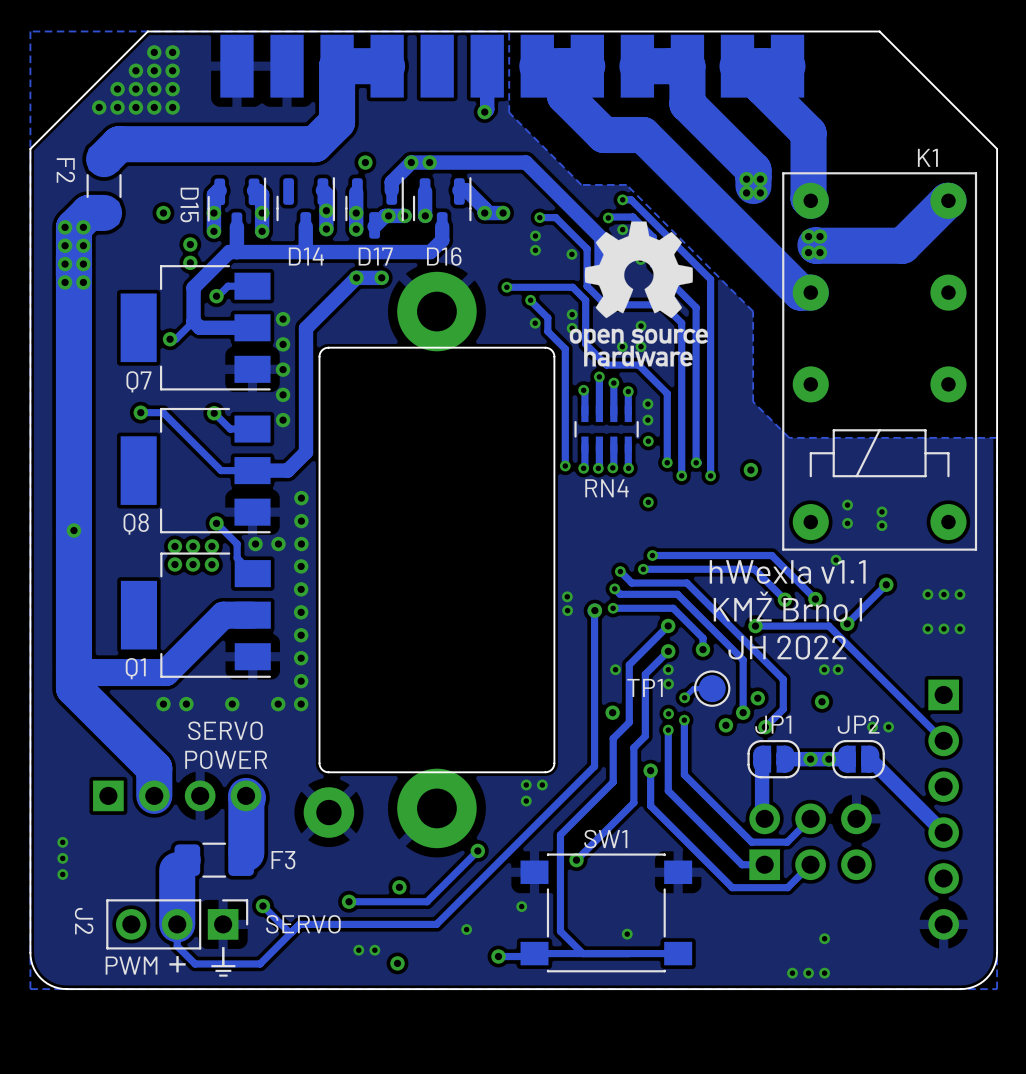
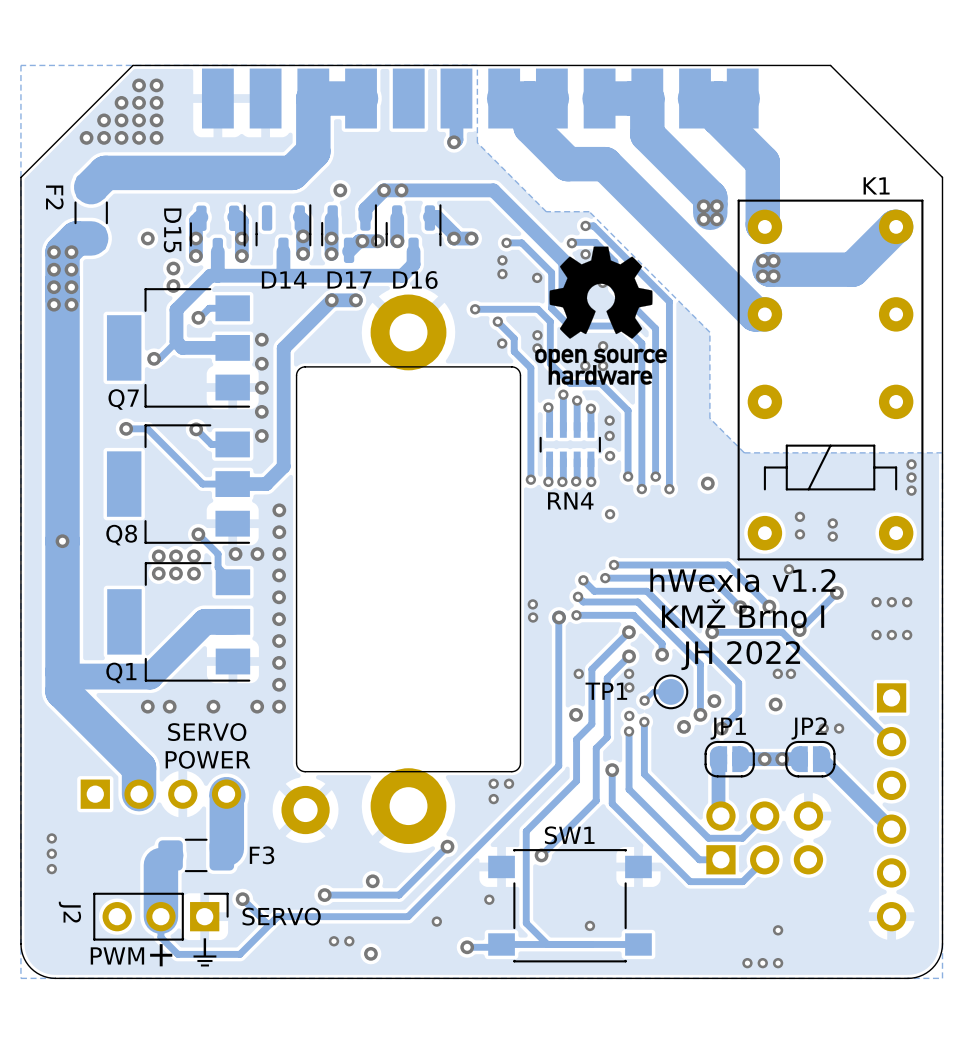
via: none -> (911, 464)
via: none -> (911, 477)
via: none -> (911, 490)
text: hWexla v1.1 (787, 572) -> hWexla v1.2 (742, 580)

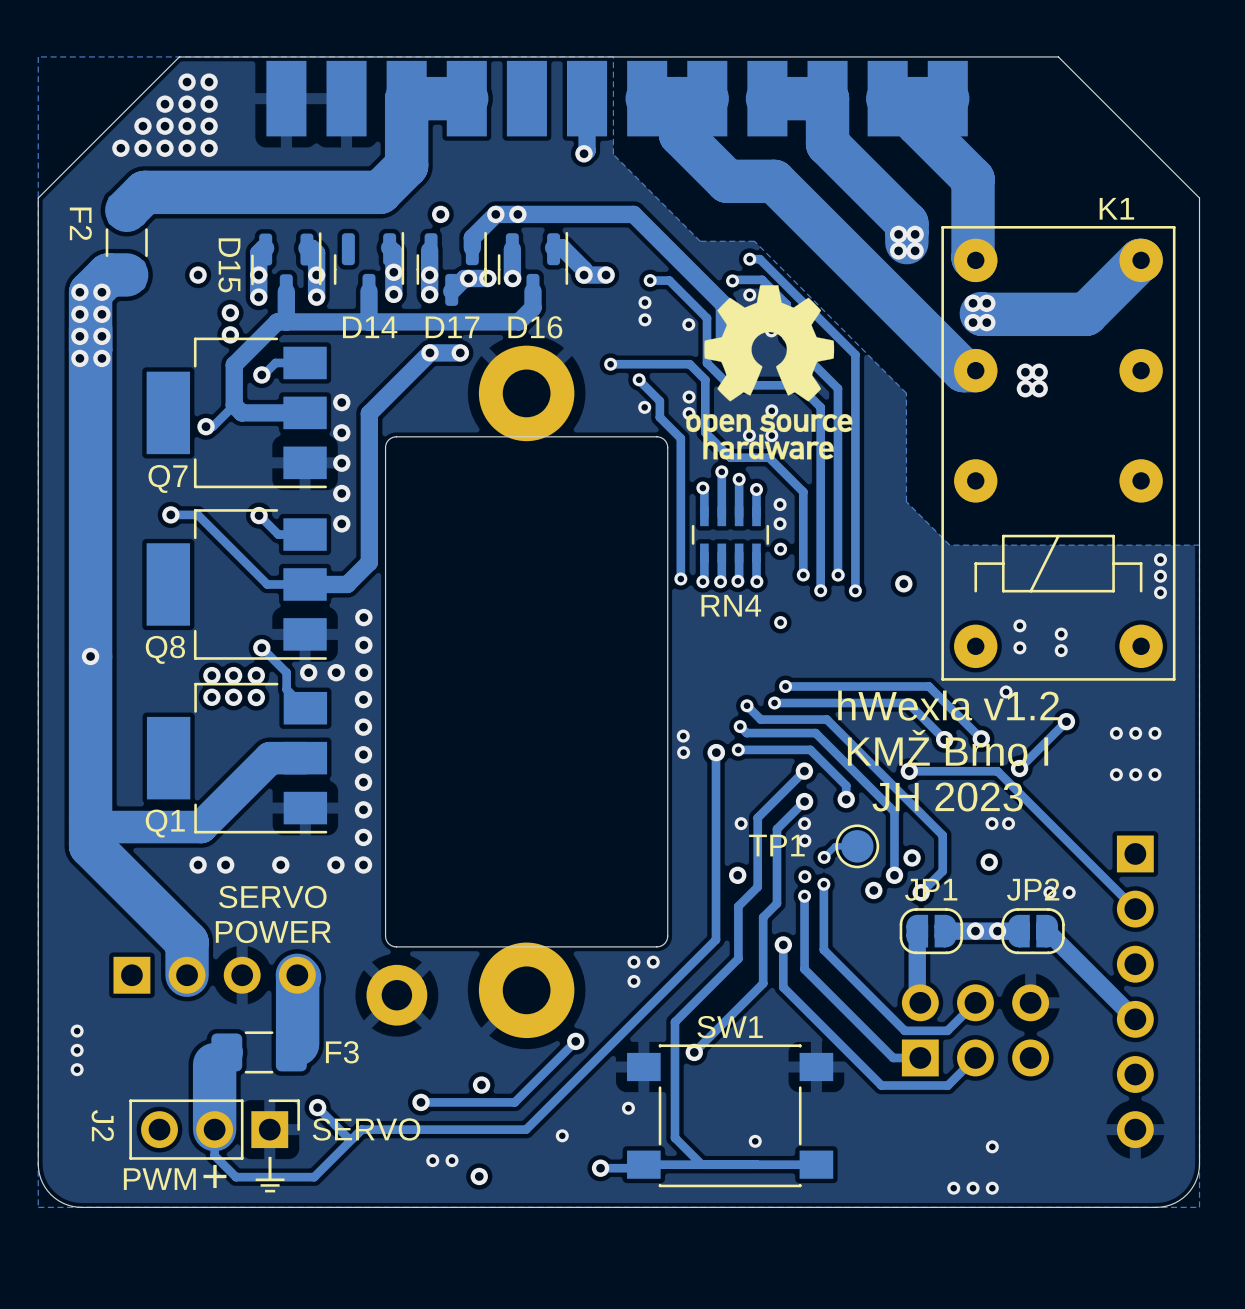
via: none -> (1025, 372)
via: none -> (1039, 372)
via: none -> (1025, 388)
via: none -> (1039, 388)
text: JH 2022 (740, 655) -> JH 2023 (947, 797)

